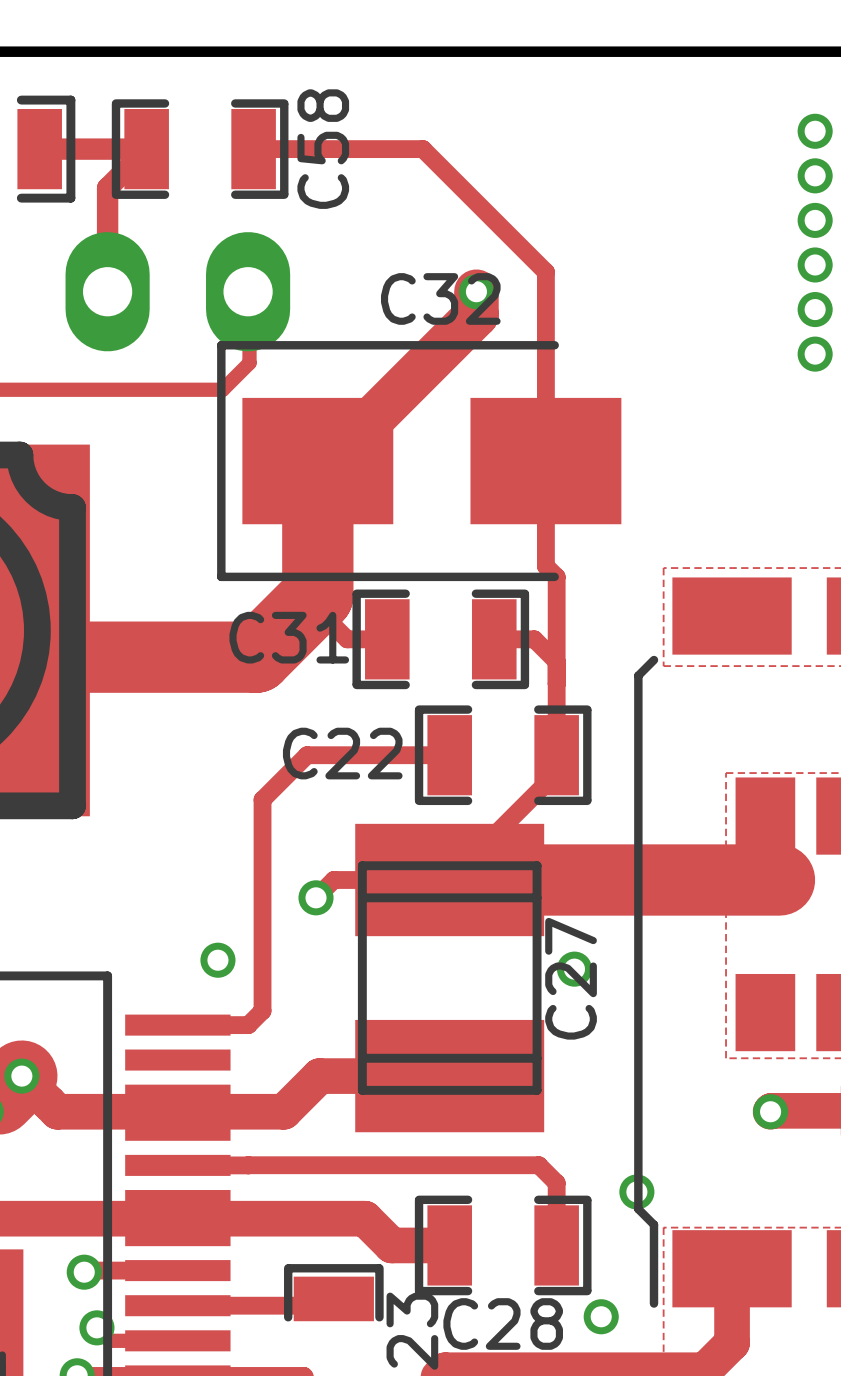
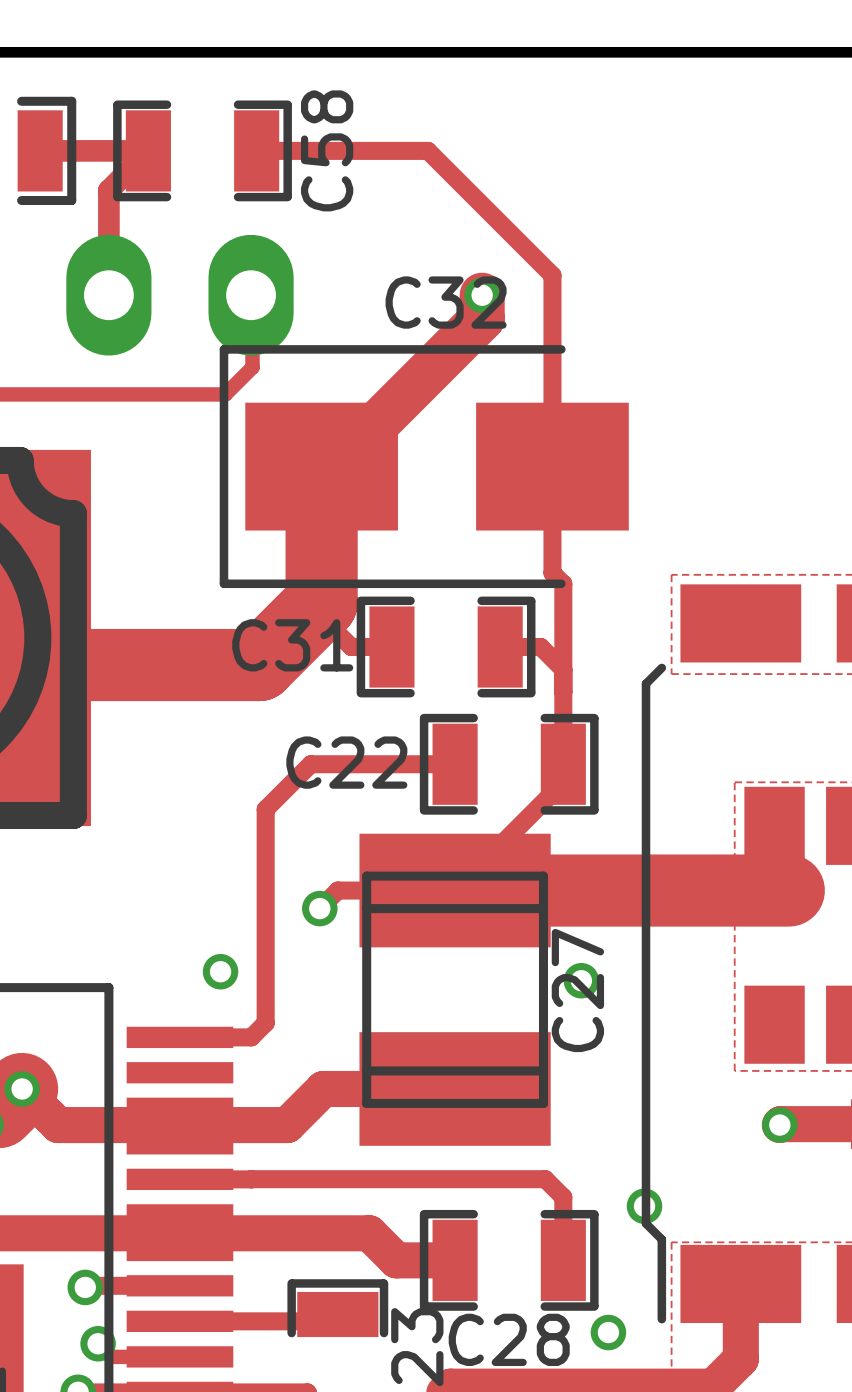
part: (815, 131) -> none
part: (815, 175) -> none
part: (815, 220) -> none
part: (815, 264) -> none
part: (815, 309) -> none
part: (815, 354) -> none

